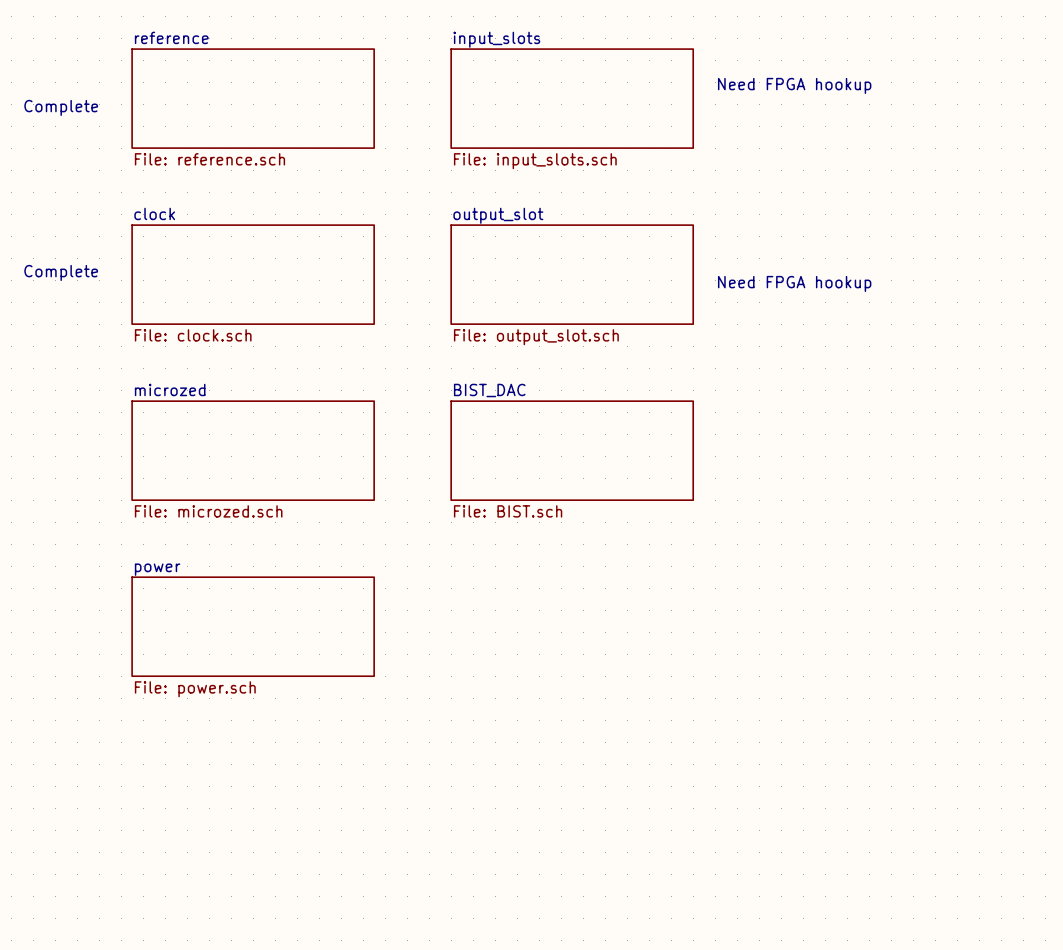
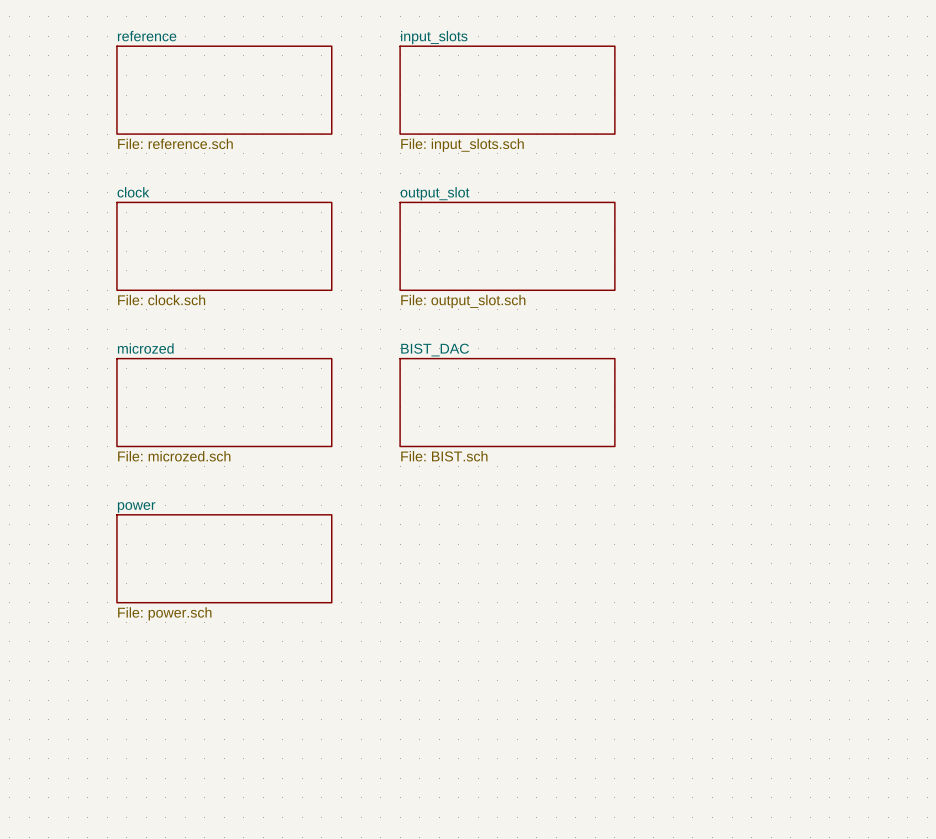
text: Need FPGA hookup (794, 85) -> none
text: Complete (61, 107) -> none
text: Complete (61, 272) -> none
text: Need FPGA hookup (794, 283) -> none

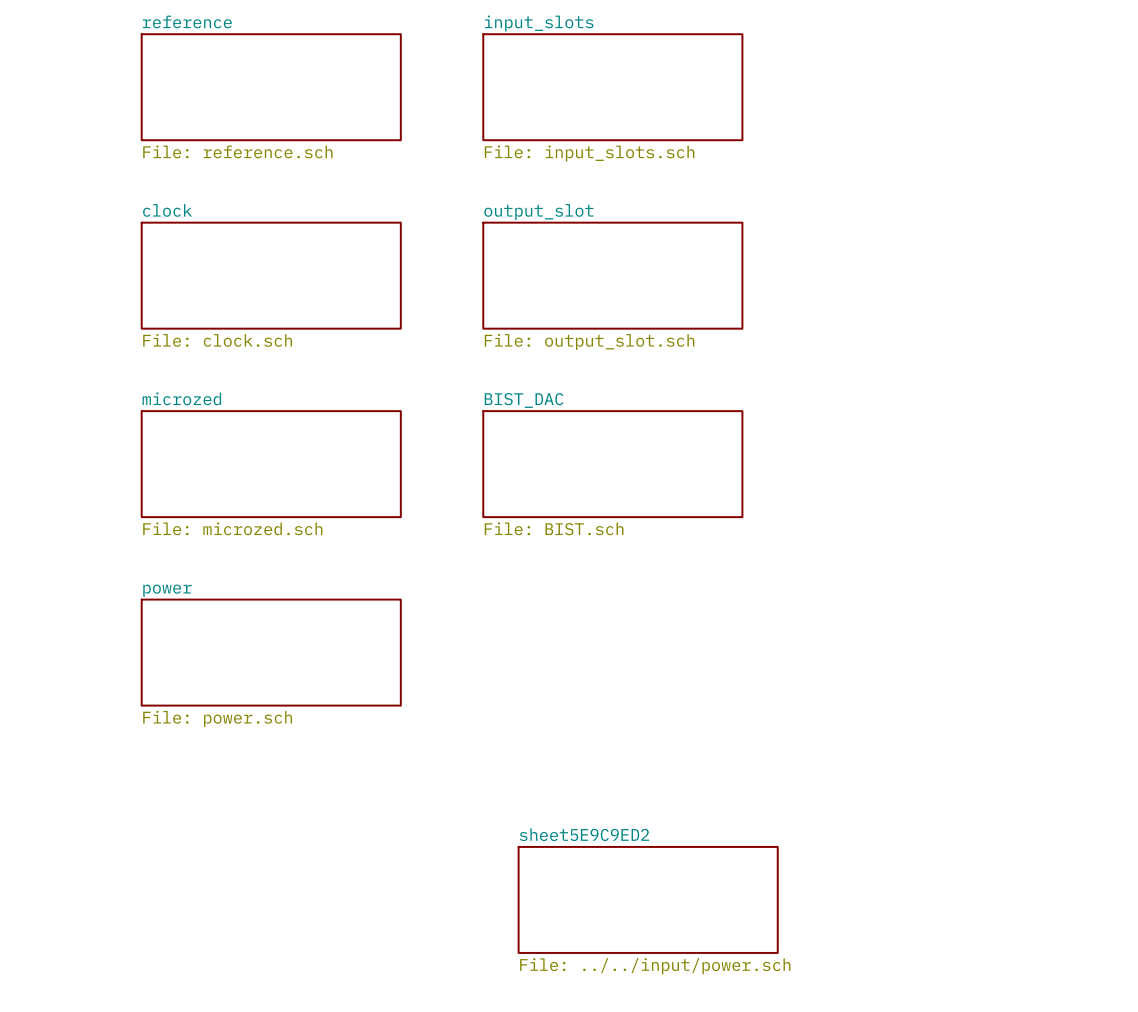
sheet sheet5E9C9ED2: none -> File: ../../input/power.sch (648, 899)

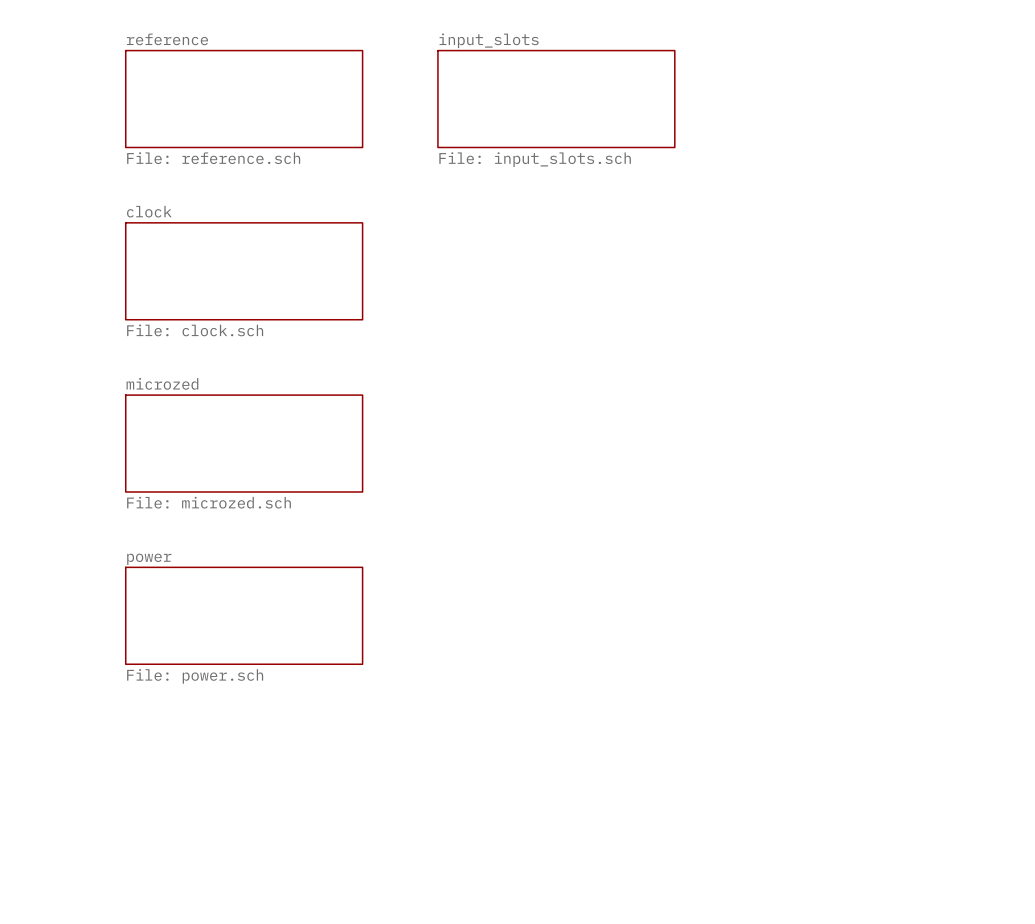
sheet output_slot: File: output_slot.sch (612, 275) -> none
sheet BIST_DAC: File: BIST.sch (612, 464) -> none
sheet sheet5E9C9ED2: File: ../../input/power.sch (648, 899) -> none

